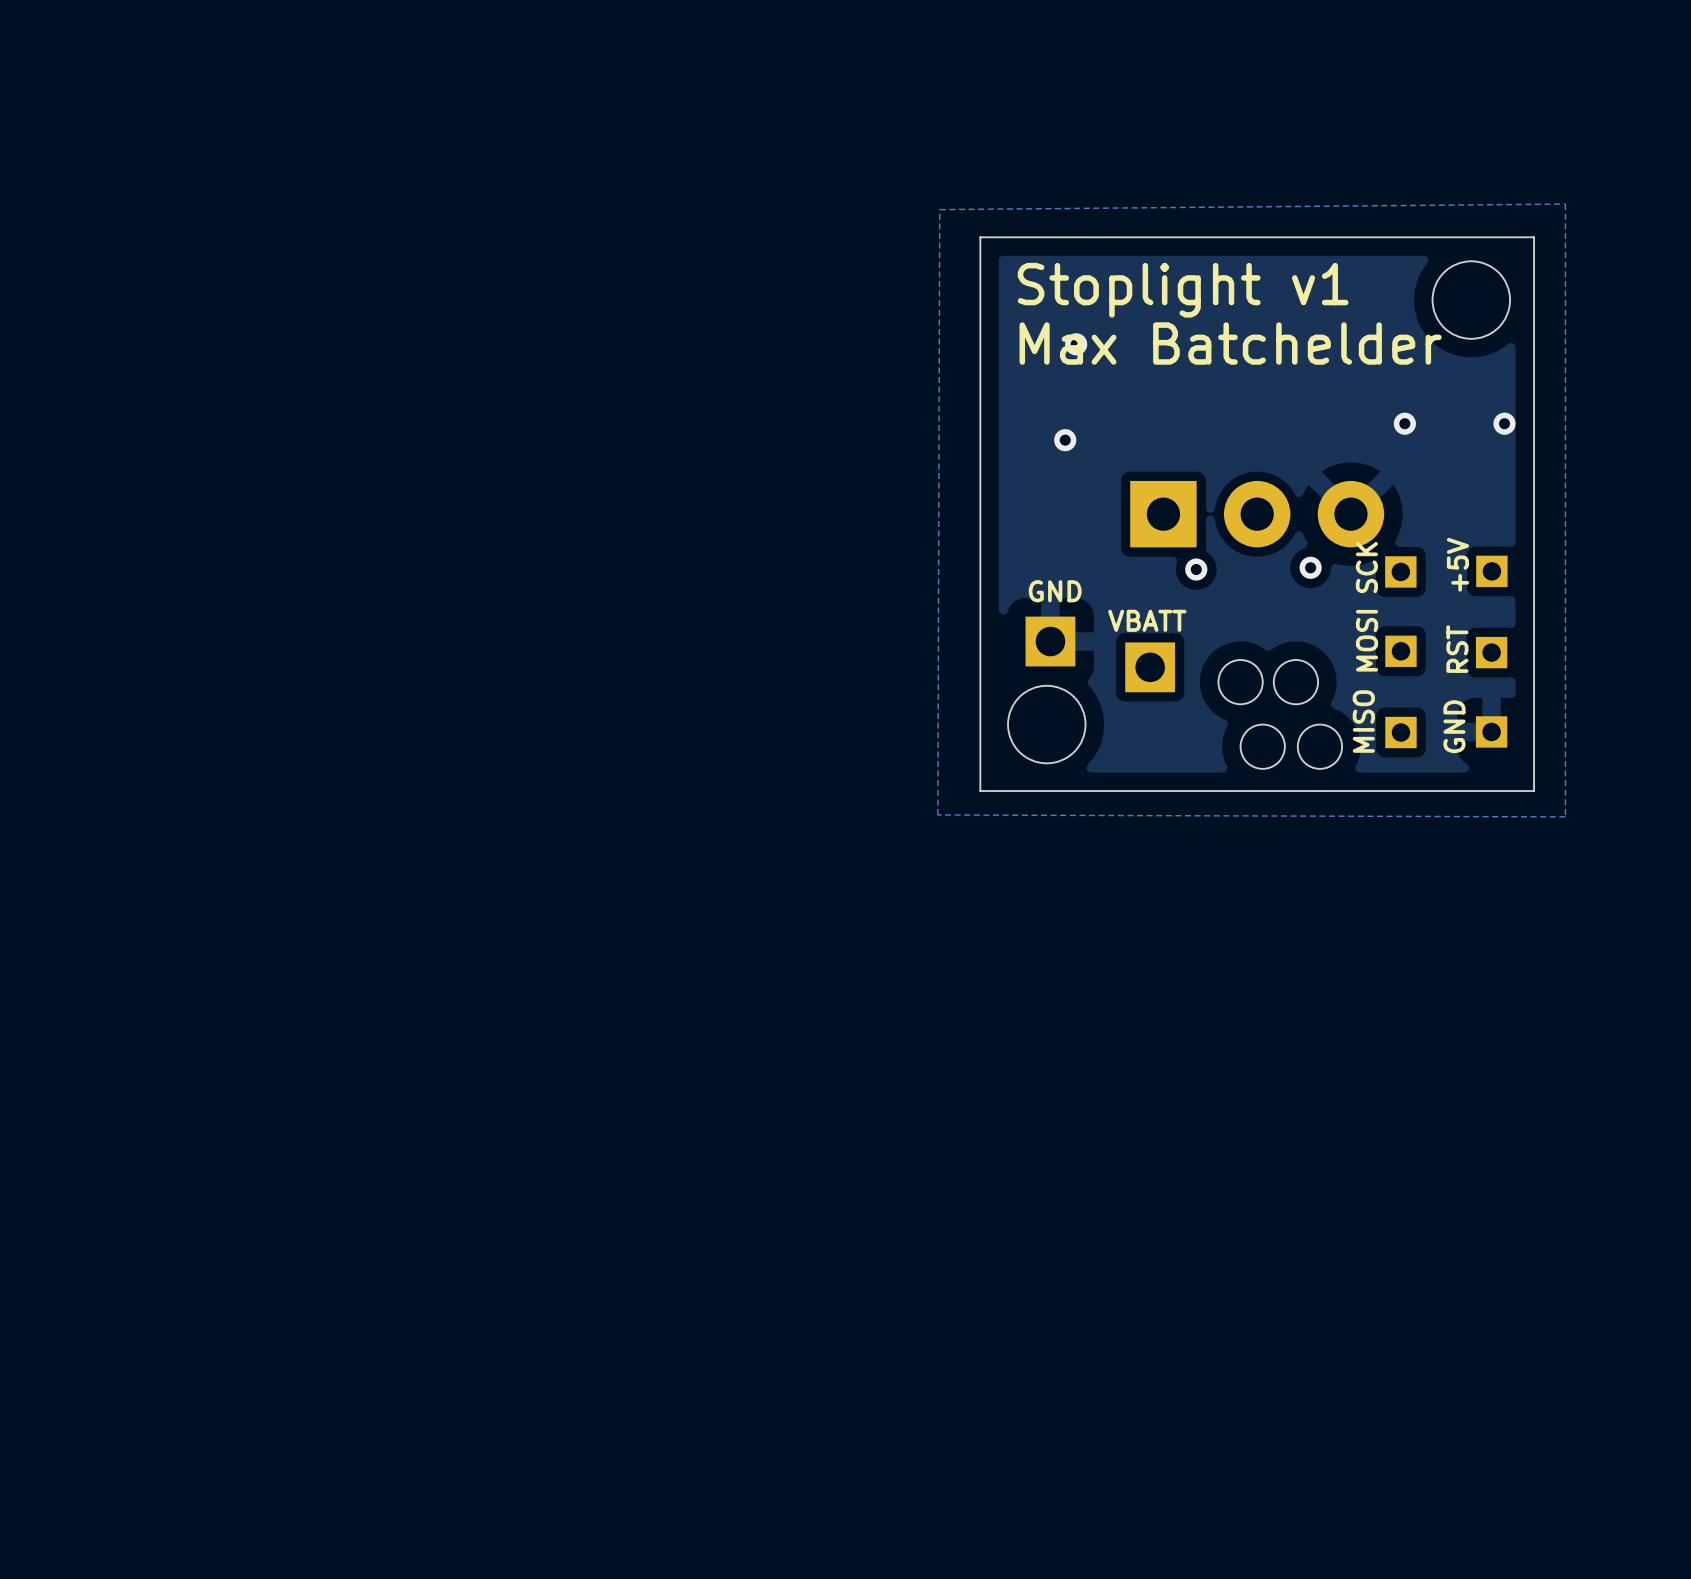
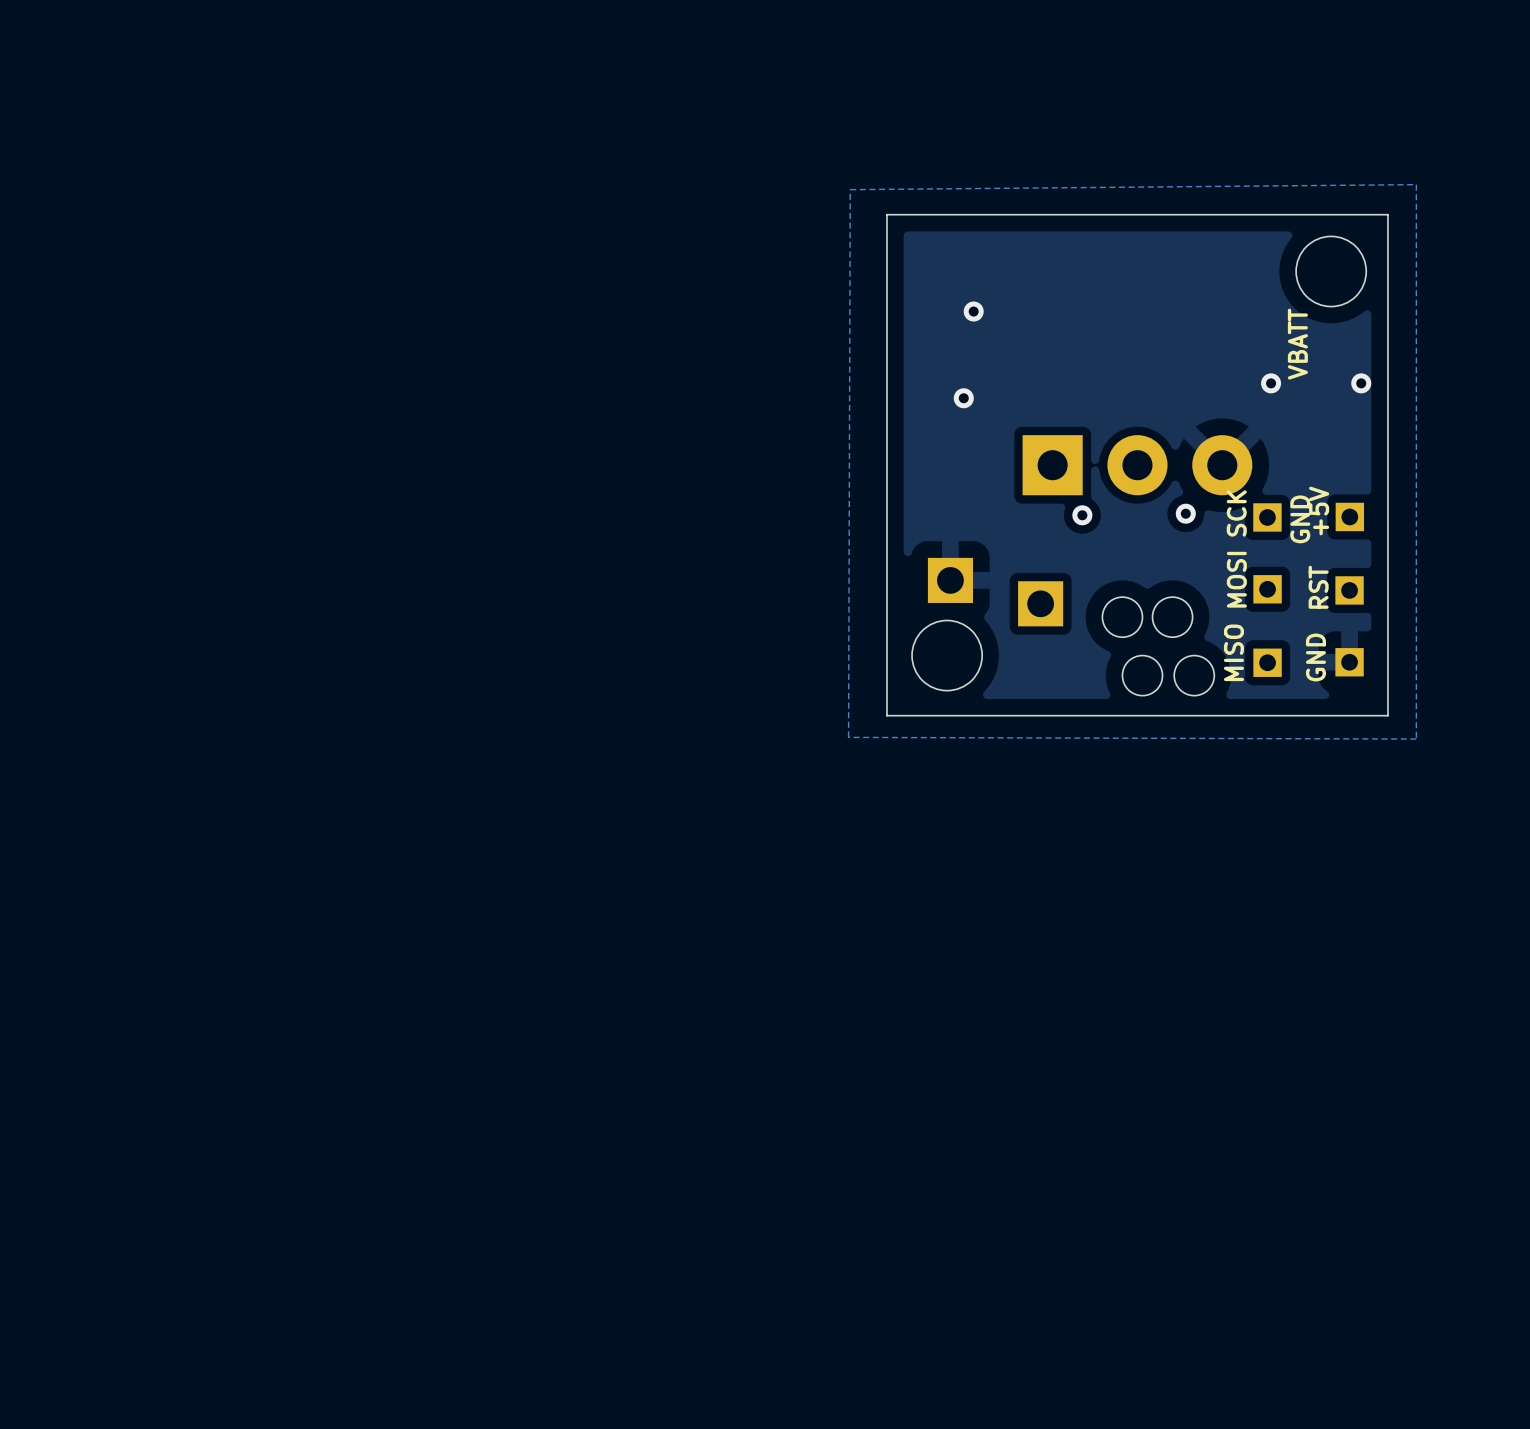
text: Stoplight v1 (1183, 290) -> none
text: Max Batchelder (1230, 343) -> none
text rotation: 0° (1055, 591) -> 90° counterclockwise (1300, 519)
text position: GND (1055, 591) -> GND (1300, 519)
text rotation: 0° (1147, 620) -> 90° counterclockwise (1297, 344)
text position: VBATT (1147, 620) -> VBATT (1297, 344)

